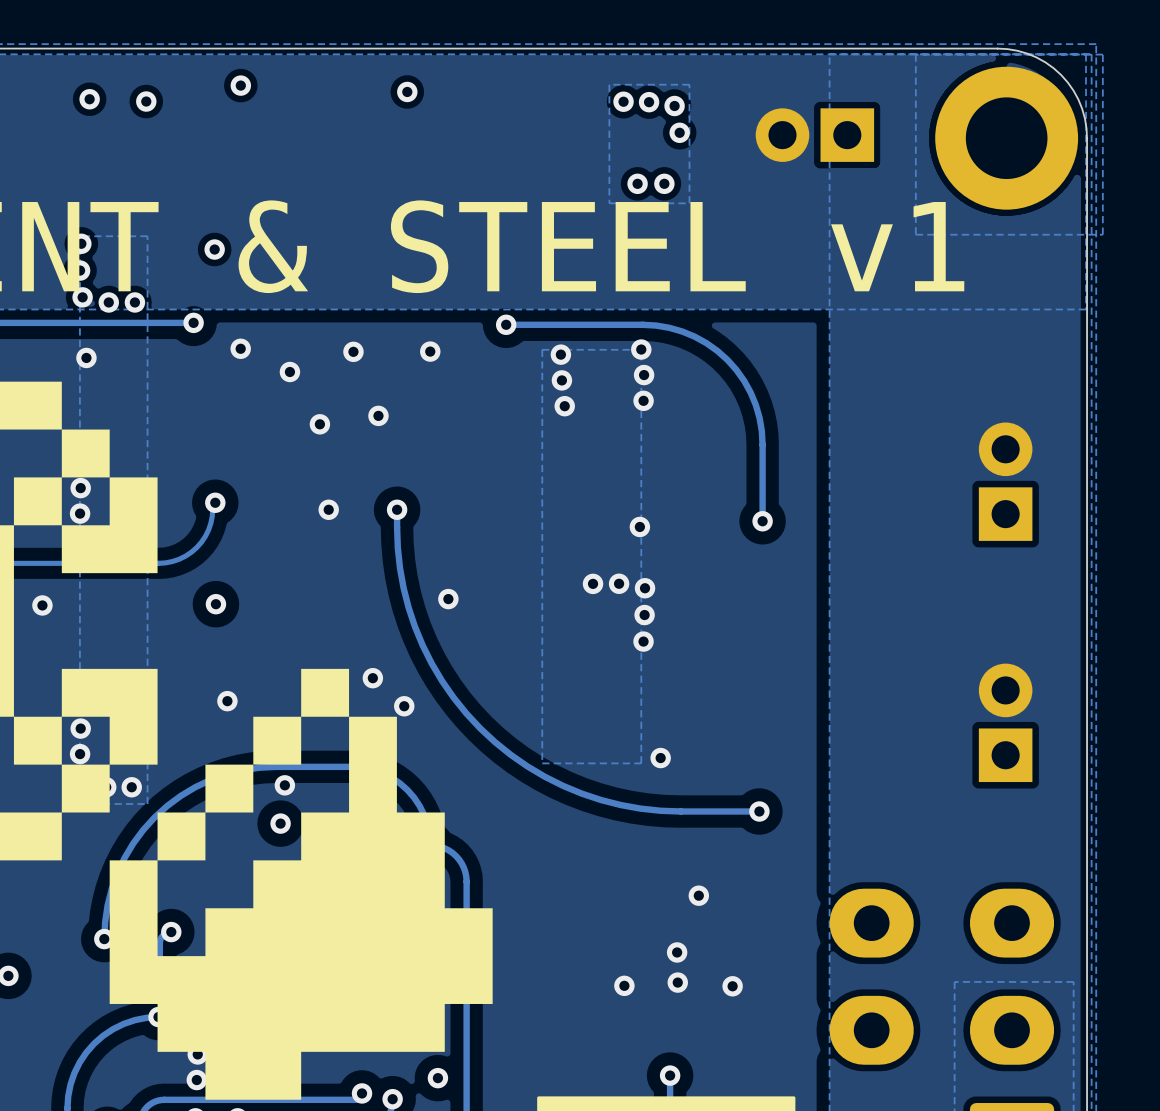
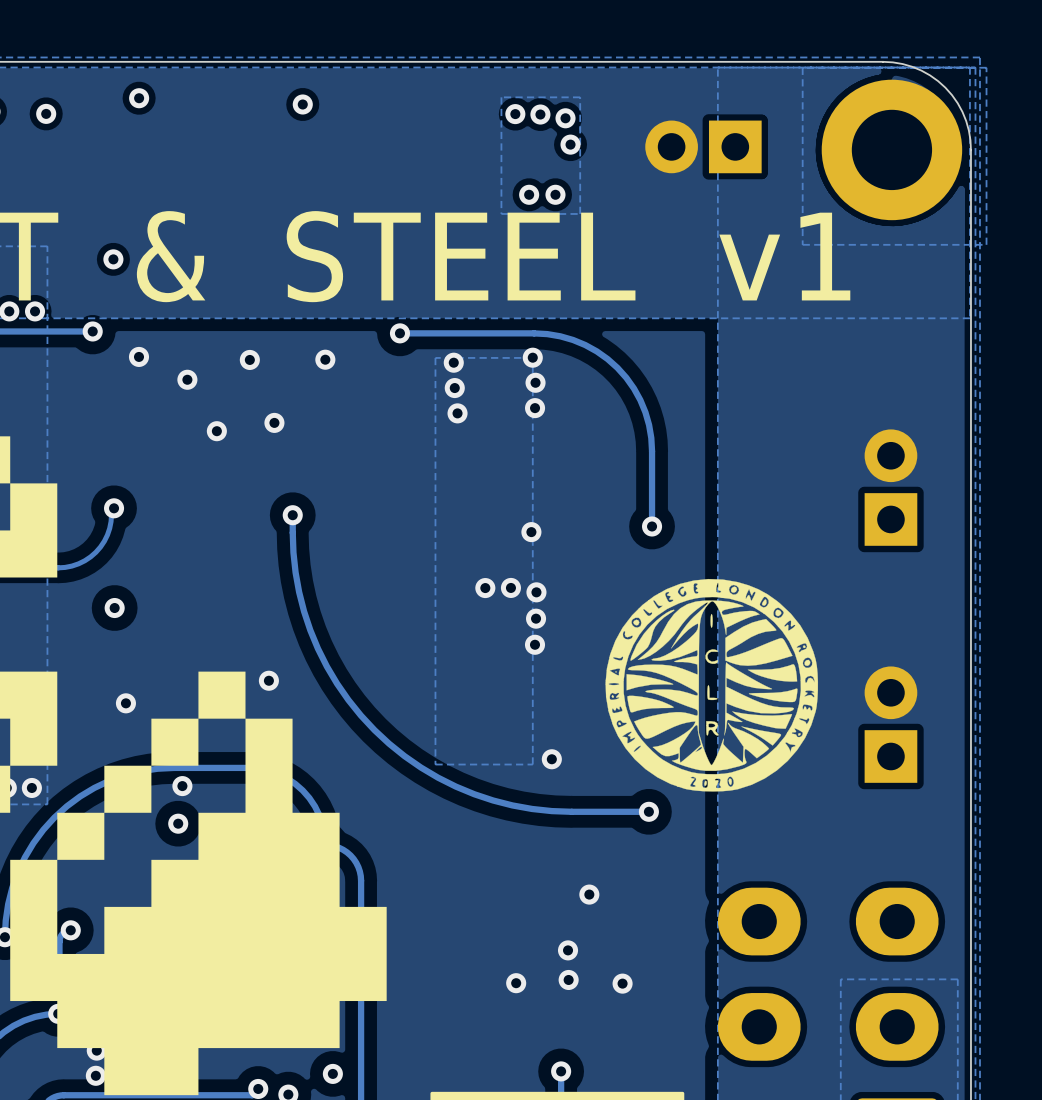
via: (328, 509) -> none
drawing: none -> [605, 578, 819, 792]
via: (448, 599) -> none
via: (404, 706) -> none

